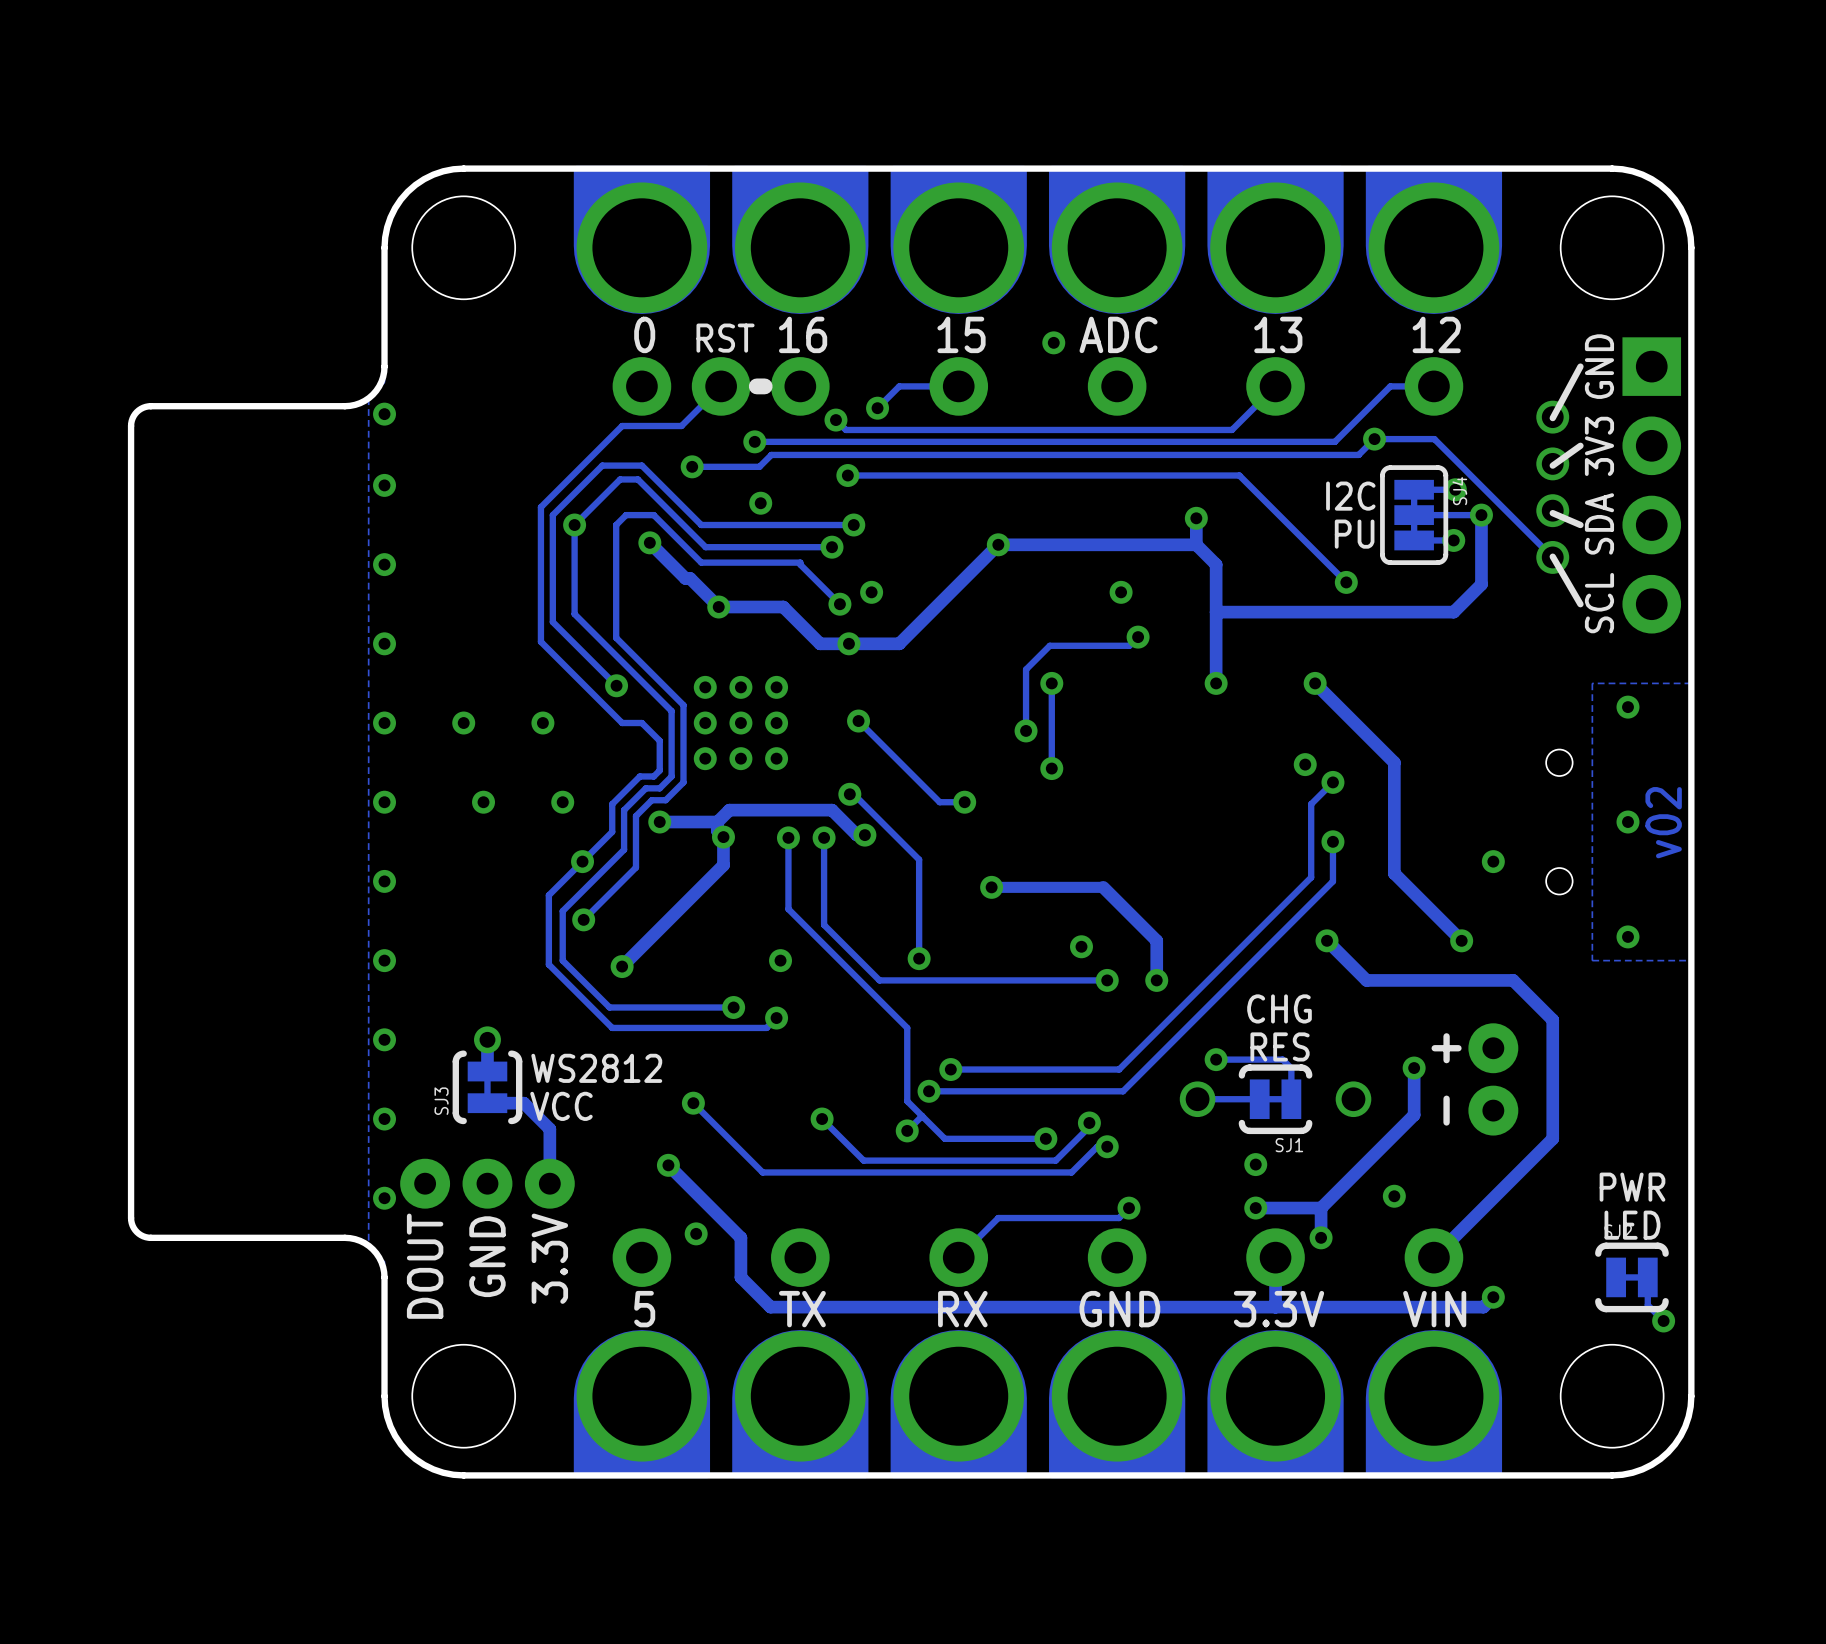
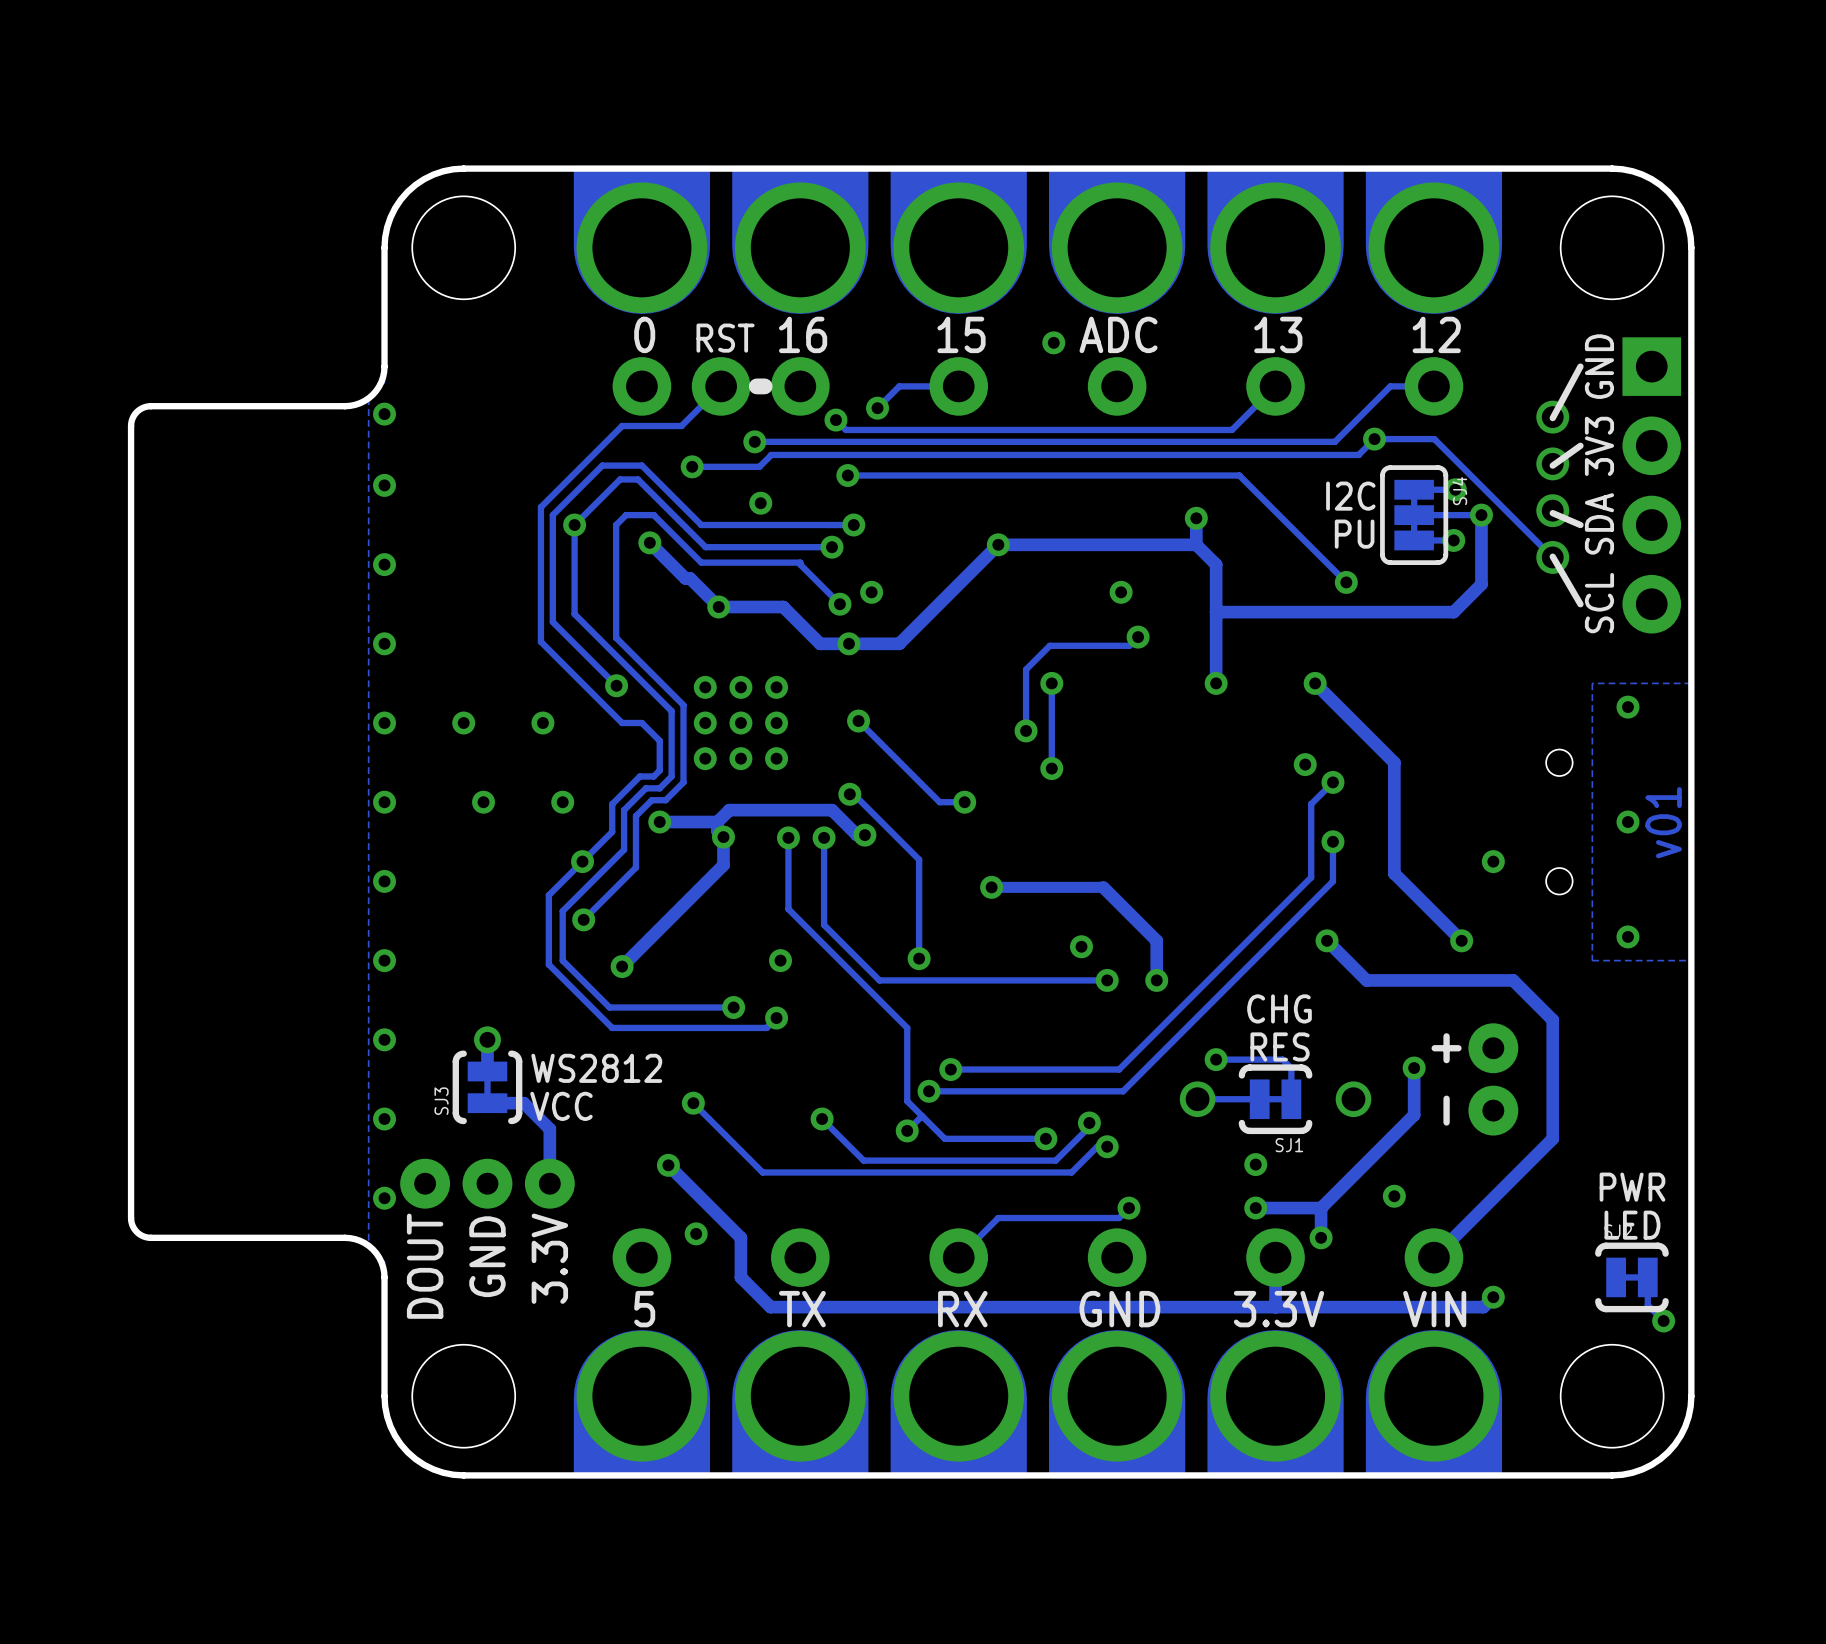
text: v02 (1663, 822) -> v01 (1663, 822)

